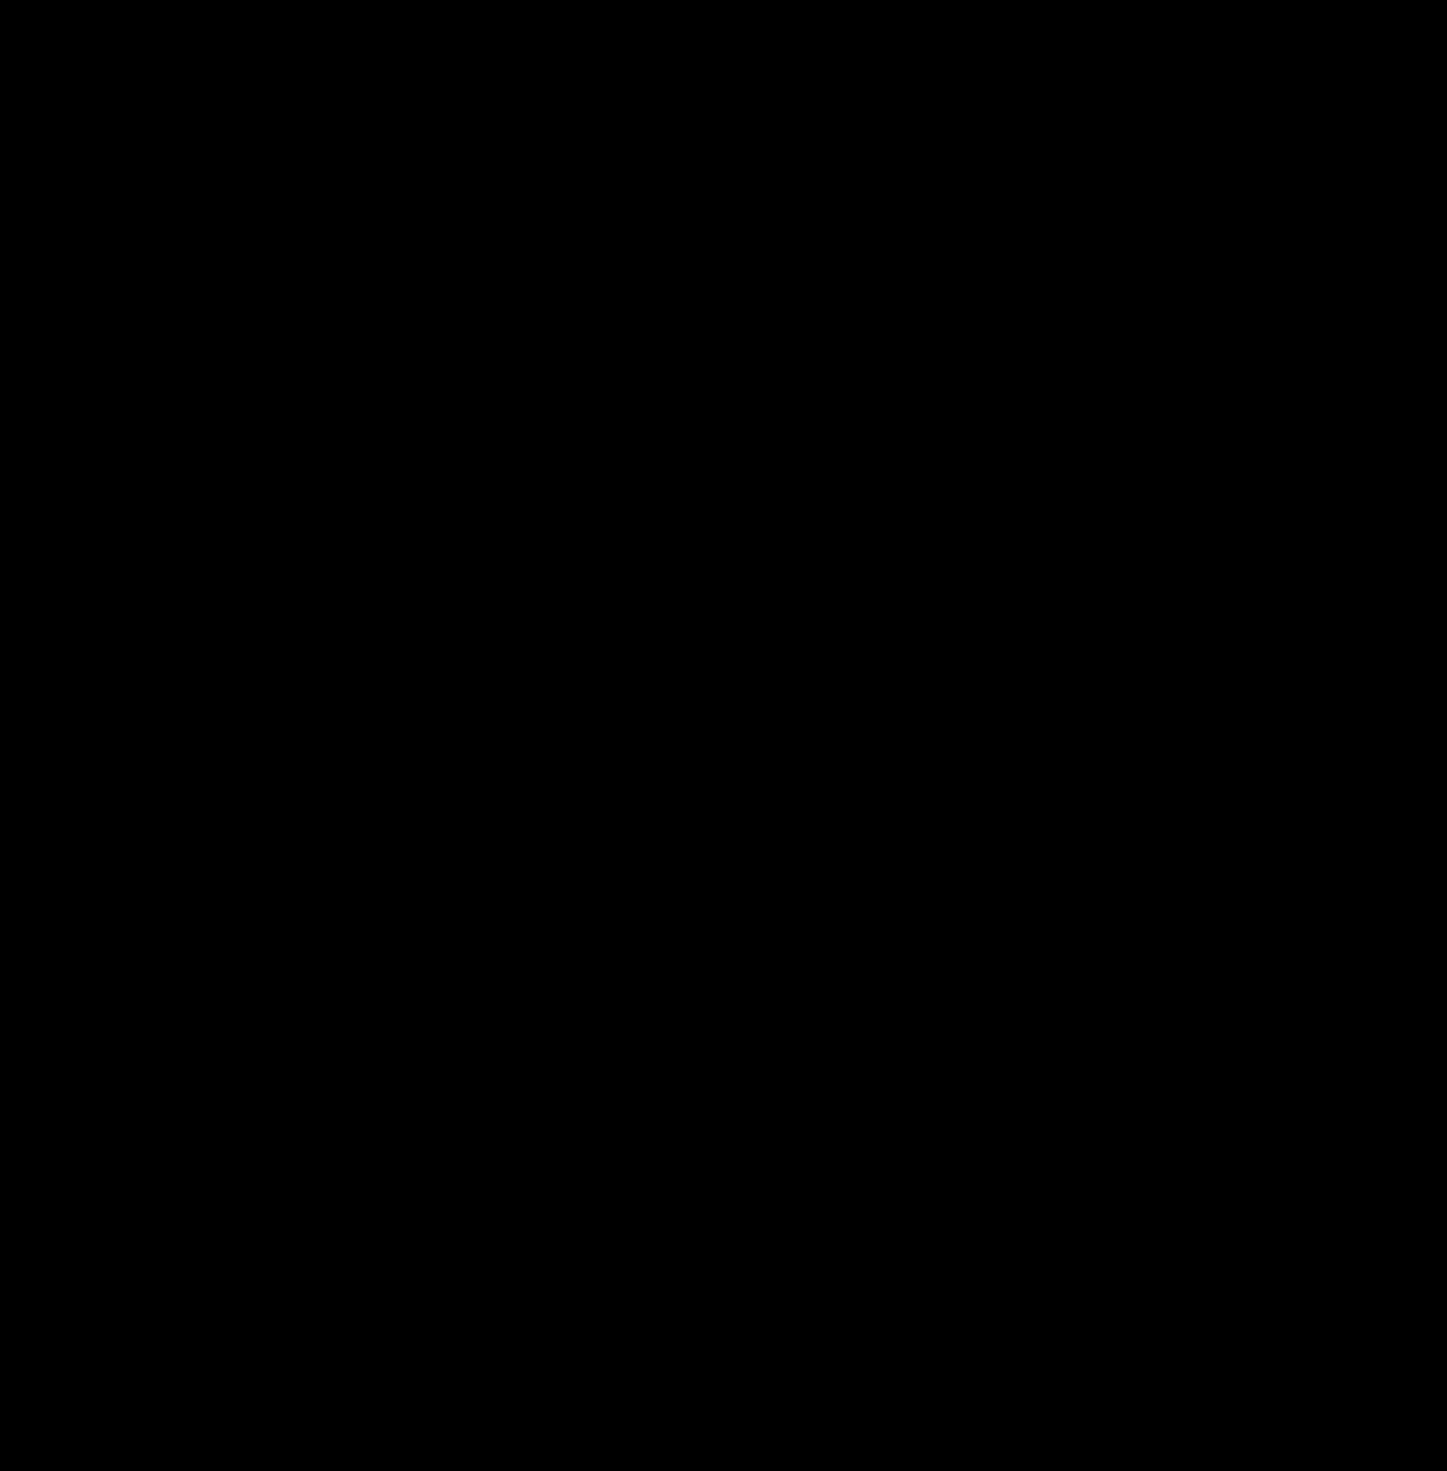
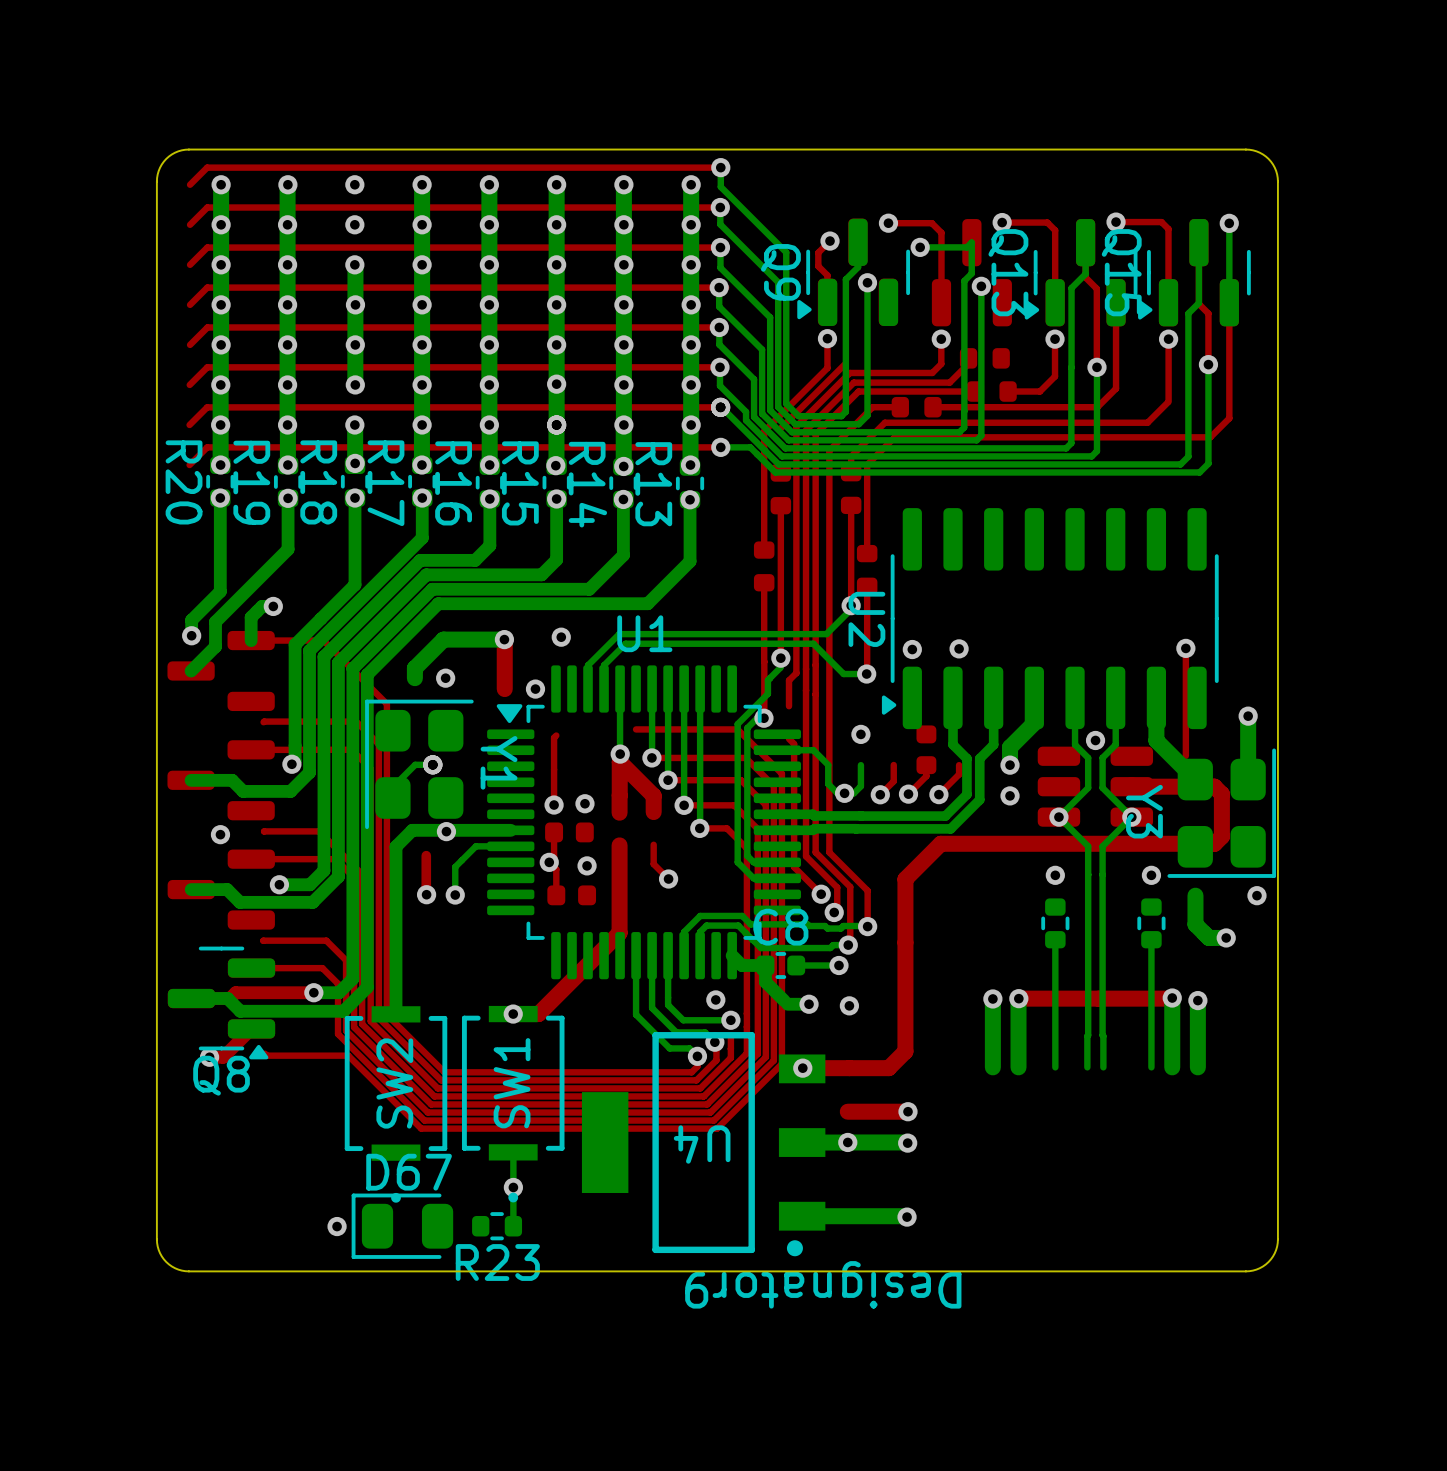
board edge: none -> (1245, 149) (188, 149) (178, 151) (166, 158) (160, 167) (156, 181) (156, 1239) (160, 1253) (166, 1262) (175, 1268) (188, 1271) (1245, 1271) (1259, 1268) (1268, 1262) (1276, 1249) (1277, 1239) (1277, 181) (1274, 167) (1268, 158) (1259, 152) (1245, 149)
top track: none -> (720, 167) (207, 167) (190, 184)
bottom track: none -> (720, 167) (720, 186) (786, 252) (786, 403) (798, 416) (841, 416) (845, 411) (845, 279) (858, 267) (858, 242)
via: none -> (720, 167)
bottom track: none -> (221, 184) (221, 344)
via: none -> (221, 184)
via: none -> (287, 184)
via: none -> (354, 184)
via: none -> (422, 184)
via: none -> (489, 184)
via: none -> (556, 184)
bottom track: none -> (623, 184) (623, 424)
via: none -> (623, 184)
bottom track: none -> (691, 184) (691, 424)
via: none -> (691, 184)
top track: none -> (720, 207) (207, 207) (190, 224)
bottom track: none -> (720, 207) (720, 224) (778, 282) (778, 407) (795, 424) (858, 424) (867, 415) (867, 282)
via: none -> (720, 207)
top track: none -> (1002, 222) (1047, 222) (1055, 230) (1055, 302)
via: none -> (1002, 222)
top track: none -> (1116, 222) (1161, 222) (1168, 229) (1168, 302)
via: none -> (1116, 222)
top track: none -> (888, 223) (931, 223) (941, 232) (941, 302)
via: none -> (888, 223)
bottom track: none -> (1229, 223) (1229, 302)
via: none -> (1229, 223)
via: none -> (221, 224)
via: none -> (287, 224)
via: none -> (354, 224)
via: none -> (422, 224)
via: none -> (489, 224)
via: none -> (556, 224)
via: none -> (623, 224)
via: none -> (691, 224)
top track: none -> (830, 241) (818, 252) (818, 266) (827, 275) (827, 302)
via: none -> (830, 241)
top track: none -> (1085, 242) (1085, 277) (1096, 288) (1096, 367)
bottom track: none -> (1085, 242) (1085, 274) (1071, 288) (1071, 443) (1066, 448) (785, 448) (754, 417) (754, 379) (719, 344) (719, 327)
top track: none -> (1198, 242) (1198, 303) (1208, 313) (1208, 364)
bottom track: none -> (1198, 242) (1198, 303) (1188, 313) (1188, 456) (1180, 464) (778, 464) (720, 407)
bottom track: none -> (720, 247) (720, 267) (770, 317) (770, 410) (792, 432) (959, 432) (964, 427) (964, 411)
via: none -> (720, 247)
top track: none -> (725, 247) (207, 247) (190, 264)
bottom track: none -> (920, 247) (966, 247) (971, 242) (971, 273) (964, 280) (964, 410)
via: none -> (920, 247)
via: none -> (221, 264)
via: none -> (287, 264)
via: none -> (354, 264)
via: none -> (422, 264)
via: none -> (489, 264)
via: none -> (556, 264)
via: none -> (623, 264)
via: none -> (691, 264)
bottom track: none -> (355, 265) (355, 384)
Q9: none -> (853, 272)
part: none -> (971, 272)
Q13: none -> (1081, 272)
Q15: none -> (1194, 272)
via: none -> (867, 282)
bottom track: none -> (981, 286) (981, 435) (976, 440) (788, 440) (762, 413) (762, 349) (719, 306) (719, 287)
via: none -> (981, 286)
via: none -> (719, 287)
top track: none -> (726, 287) (207, 287) (190, 304)
top track: none -> (1116, 302) (1116, 388) (1097, 407) (932, 407)
top track: none -> (1229, 302) (1229, 418) (1210, 437) (894, 437) (867, 464) (867, 553)
via: none -> (221, 304)
via: none -> (287, 304)
via: none -> (355, 304)
via: none -> (422, 304)
via: none -> (489, 304)
via: none -> (556, 304)
via: none -> (623, 304)
via: none -> (691, 304)
top track: none -> (719, 327) (207, 327) (190, 344)
via: none -> (719, 327)
top track: none -> (827, 338) (827, 368) (764, 431) (764, 550)
via: none -> (827, 338)
top track: none -> (941, 339) (941, 363) (932, 372) (849, 372) (796, 426) (796, 673) (789, 680) (789, 706)
via: none -> (941, 339)
top track: none -> (1055, 339) (1055, 376) (1039, 391) (1008, 391)
via: none -> (1055, 339)
top track: none -> (1168, 339) (1168, 401)
via: none -> (1168, 339)
via: none -> (221, 344)
via: none -> (287, 344)
via: none -> (355, 344)
via: none -> (422, 344)
via: none -> (489, 344)
via: none -> (556, 344)
via: none -> (623, 344)
via: none -> (691, 344)
top track: none -> (968, 358) (968, 363) (949, 382) (853, 382) (806, 430) (806, 856) (837, 887) (837, 909) (834, 912)
part: none -> (984, 358)
top track: none -> (845, 363) (780, 428)
bottom track: none -> (1208, 364) (1208, 463) (1199, 472) (775, 472) (750, 447) (720, 447)
via: none -> (1208, 364)
top track: none -> (719, 367) (207, 367) (189, 384)
via: none -> (719, 367)
bottom track: none -> (1096, 367) (1096, 451) (1091, 456) (782, 456) (746, 420) (746, 411) (719, 385) (719, 367)
via: none -> (1096, 367)
via: none -> (220, 384)
via: none -> (287, 384)
via: none -> (355, 384)
via: none -> (422, 384)
via: none -> (489, 384)
via: none -> (556, 384)
via: none -> (623, 384)
via: none -> (691, 384)
top track: none -> (975, 391) (858, 391) (815, 434) (815, 852) (850, 886) (850, 943) (848, 945)
part: none -> (991, 391)
top track: none -> (1167, 402) (1147, 422) (884, 422) (851, 456) (851, 472)
top track: none -> (720, 407) (207, 407) (189, 424)
via: none -> (720, 407)
top track: none -> (900, 407) (872, 407) (829, 450) (829, 852) (867, 890) (867, 926) (863, 922)
part: none -> (916, 407)
via: none -> (220, 424)
via: none -> (287, 424)
via: none -> (354, 424)
via: none -> (422, 424)
via: none -> (489, 424)
via: none -> (556, 424)
via: none -> (623, 424)
via: none -> (691, 424)
bottom track: none -> (355, 425) (355, 464)
bottom track: none -> (623, 425) (623, 465)
bottom track: none -> (690, 425) (690, 465)
top track: none -> (720, 447) (207, 447) (189, 465)
via: none -> (720, 447)
via: none -> (355, 463)
via: none -> (220, 465)
via: none -> (287, 465)
via: none -> (421, 465)
via: none -> (489, 465)
via: none -> (555, 465)
via: none -> (690, 465)
via: none -> (623, 466)
R20: none -> (220, 481)
R18: none -> (355, 481)
R17: none -> (422, 481)
R19: none -> (288, 482)
R16: none -> (489, 482)
R15: none -> (556, 482)
R14: none -> (623, 483)
R13: none -> (690, 483)
part: none -> (780, 489)
part: none -> (851, 489)
bottom track: none -> (220, 498) (220, 591) (191, 620) (191, 635)
via: none -> (220, 498)
bottom track: none -> (288, 498) (288, 549) (215, 621) (215, 646) (191, 671)
via: none -> (288, 498)
bottom track: none -> (355, 498) (355, 584) (295, 644) (295, 761) (291, 764)
via: none -> (355, 498)
bottom track: none -> (422, 498) (422, 538) (309, 650) (309, 772) (290, 791) (243, 791) (232, 780) (191, 780)
via: none -> (422, 498)
bottom track: none -> (489, 498) (489, 545) (475, 560) (420, 560) (323, 656) (323, 870) (309, 884) (279, 884)
via: none -> (489, 498)
bottom track: none -> (556, 498) (556, 559) (541, 574) (426, 574) (338, 662) (338, 876) (312, 902) (239, 902) (227, 889) (191, 889)
via: none -> (556, 498)
bottom track: none -> (623, 499) (623, 555) (589, 589) (432, 589) (352, 668) (352, 978) (338, 992) (313, 992)
via: none -> (623, 499)
bottom track: none -> (690, 499) (690, 561) (647, 603) (438, 603) (367, 674) (367, 987) (343, 1011) (240, 1011) (227, 998) (191, 998)
via: none -> (690, 499)
top track: none -> (780, 505) (780, 658)
top track: none -> (851, 505) (851, 605)
part: none -> (764, 566)
part: none -> (867, 569)
top track: none -> (867, 586) (866, 674)
bottom track: none -> (851, 605) (851, 609) (826, 634) (619, 634) (588, 665) (588, 689)
via: none -> (851, 605)
bottom track: none -> (273, 606) (262, 606) (251, 617) (251, 640)
via: none -> (273, 606)
U2: none -> (1050, 618)
via: none -> (191, 635)
via: none -> (561, 637)
top track: none -> (504, 639) (504, 689)
bottom track: none -> (504, 639) (443, 639) (414, 668) (414, 678)
via: none -> (504, 639)
top track: none -> (251, 640) (323, 640) (386, 704) (386, 1014) (444, 1072) (691, 1072) (697, 1066) (697, 1056)
via: none -> (959, 648)
top track: none -> (1185, 648) (1185, 755)
via: none -> (1185, 648)
via: none -> (912, 649)
bottom track: none -> (780, 658) (780, 667) (767, 680) (767, 693) (737, 724) (737, 862) (753, 878) (777, 878)
via: none -> (780, 658)
part: none -> (221, 670)
bottom track: none -> (866, 674) (843, 674) (813, 643) (625, 643) (604, 665) (604, 689)
via: none -> (866, 674)
via: none -> (445, 678)
bottom track: none -> (1074, 688) (1075, 744) (1088, 757) (1088, 787) (1058, 817) (1088, 846) (1087, 1067)
bottom track: none -> (1115, 688) (1115, 744) (1102, 757) (1102, 787) (1131, 817) (1102, 846) (1103, 1067)
via: none -> (535, 689)
bottom track: none -> (620, 689) (620, 753)
bottom track: none -> (652, 689) (652, 757)
bottom track: none -> (668, 689) (668, 780)
bottom track: none -> (684, 689) (684, 805)
bottom track: none -> (700, 689) (700, 828)
bottom track: none -> (953, 697) (953, 744) (966, 758) (966, 794) (945, 816) (861, 816)
bottom track: none -> (993, 697) (993, 744) (979, 758) (979, 799) (950, 828) (856, 828)
bottom track: none -> (1034, 697) (1034, 723) (1010, 747) (1010, 765)
bottom track: none -> (1156, 697) (1156, 740) (1195, 779)
bottom track: none -> (1248, 716) (1248, 779)
via: none -> (1248, 716)
bottom track: none -> (763, 718) (757, 718) (747, 728) (747, 855) (753, 862) (777, 862)
via: none -> (763, 718)
top track: none -> (263, 722) (356, 721) (378, 744) (378, 1018) (441, 1080) (696, 1080) (716, 1060) (714, 1042)
top track: none -> (636, 729) (737, 729) (781, 773) (781, 1063) (717, 1128) (421, 1128) (348, 1055) (266, 1055) (265, 1053)
via: none -> (860, 734)
top track: none -> (556, 735) (554, 737) (554, 805)
top track: none -> (789, 738) (794, 744) (794, 867) (821, 894)
via: none -> (1095, 740)
top track: none -> (251, 749) (351, 749) (370, 768) (370, 1021) (437, 1088) (700, 1088) (730, 1057) (730, 1048)
part: none -> (926, 749)
bottom track: none -> (777, 750) (813, 750) (828, 764) (828, 784) (837, 793) (853, 793) (860, 786) (860, 765)
via: none -> (620, 754)
top track: none -> (651, 757) (745, 757) (773, 786) (773, 1060) (713, 1120) (424, 1120) (338, 1034) (338, 983) (322, 968) (251, 968)
via: none -> (651, 757)
via: none -> (291, 764)
Y1: none -> (419, 764)
bottom track: none -> (432, 764) (415, 764) (392, 787) (392, 797)
via: none -> (432, 764)
top track: none -> (893, 764) (893, 781) (880, 794)
top track: none -> (926, 765) (926, 776) (908, 794)
top track: none -> (959, 765) (959, 774) (938, 794)
via: none -> (1010, 765)
part: none -> (221, 780)
top track: none -> (668, 780) (740, 780) (765, 805) (765, 1057) (710, 1112)
via: none -> (668, 780)
part: none -> (1095, 786)
top track: none -> (1131, 786) (1214, 786) (1221, 794) (1221, 836) (1214, 843) (940, 843) (905, 879) (905, 1051) (888, 1068) (802, 1068)
via: none -> (844, 793)
via: none -> (880, 794)
via: none -> (908, 794)
via: none -> (938, 794)
via: none -> (1010, 795)
via: none -> (584, 803)
via: none -> (554, 805)
top track: none -> (684, 805) (734, 805) (757, 829) (757, 1053) (707, 1104)
via: none -> (684, 805)
top track: none -> (653, 812) (653, 795) (619, 761) (619, 812)
Y3: none -> (1221, 813)
bottom track: none -> (777, 814) (861, 815)
via: none -> (1058, 817)
via: none -> (1131, 817)
U1: none -> (644, 822)
top track: none -> (699, 828) (726, 828) (746, 848) (746, 1013)
via: none -> (699, 828)
bottom track: none -> (856, 828) (777, 830)
bottom track: none -> (510, 830) (412, 830) (396, 846) (396, 1014)
top track: none -> (264, 831) (319, 831) (362, 874) (362, 1024) (434, 1096) (703, 1096)
via: none -> (446, 831)
top track: none -> (554, 832) (554, 857) (549, 862) (556, 869) (556, 895)
part: none -> (569, 832)
via: none -> (220, 834)
top track: none -> (653, 844) (653, 864) (668, 879)
top track: none -> (619, 845) (619, 932) (538, 1014) (513, 1014)
bottom track: none -> (510, 846) (475, 846) (455, 867) (455, 895)
top track: none -> (426, 855) (426, 894)
top track: none -> (251, 859) (335, 859) (354, 877) (354, 1027) (431, 1104) (706, 1104)
via: none -> (549, 862)
via: none -> (587, 865)
via: none -> (1055, 875)
via: none -> (1151, 875)
via: none -> (668, 879)
via: none -> (279, 884)
part: none -> (221, 889)
via: none -> (426, 894)
via: none -> (821, 894)
via: none -> (455, 895)
part: none -> (571, 895)
bottom track: none -> (1195, 895) (1195, 924) (1208, 937) (1226, 937)
via: none -> (1256, 895)
via: none -> (834, 912)
part: none -> (1055, 923)
part: none -> (1151, 923)
bottom track: none -> (867, 926) (843, 926) (840, 928) (827, 928) (825, 926) (807, 924) (750, 924) (742, 915) (700, 915) (684, 932) (684, 955)
via: none -> (867, 926)
via: none -> (1226, 937)
bottom track: none -> (1055, 939) (1055, 1067)
bottom track: none -> (1151, 939) (1151, 1067)
top track: none -> (263, 940) (326, 940) (346, 960) (346, 1030) (427, 1112) (710, 1112)
bottom track: none -> (848, 945) (833, 945) (830, 948) (760, 948) (738, 925) (706, 925) (700, 932) (700, 955)
via: none -> (848, 945)
bottom track: none -> (636, 955) (636, 1014) (669, 1048) (689, 1048) (697, 1056)
bottom track: none -> (652, 955) (652, 1008) (676, 1032) (705, 1032) (714, 1042)
bottom track: none -> (668, 955) (668, 1005) (683, 1020) (730, 1020)
bottom track: none -> (732, 955) (742, 965) (765, 965) (765, 981) (787, 1004) (809, 1004)
C8: none -> (780, 965)
bottom track: none -> (838, 965) (796, 965)
via: none -> (838, 965)
top track: none -> (313, 992) (235, 992) (229, 998) (191, 998)
via: none -> (313, 992)
bottom track: none -> (992, 998) (992, 1067)
via: none -> (992, 998)
bottom track: none -> (1018, 998) (1018, 1067)
via: none -> (1018, 998)
top track: none -> (1172, 998) (1018, 998)
bottom track: none -> (1172, 998) (1172, 1067)
via: none -> (1172, 998)
via: none -> (715, 999)
bottom track: none -> (1197, 1000) (1197, 1067)
via: none -> (1197, 1000)
Q8: none -> (221, 1002)
via: none -> (809, 1004)
via: none -> (849, 1005)
top track: none -> (746, 1013) (746, 1026)
via: none -> (513, 1014)
via: none -> (730, 1020)
top track: none -> (746, 1026) (746, 1053) (704, 1096)
top track: none -> (251, 1029) (223, 1057) (209, 1057)
top track: none -> (730, 1035) (730, 1048)
via: none -> (714, 1042)
via: none -> (697, 1056)
via: none -> (209, 1057)
via: none -> (802, 1068)
SW2: none -> (396, 1104)
SW1: none -> (513, 1104)
top track: none -> (908, 1111) (847, 1111)
via: none -> (908, 1111)
via: none -> (847, 1142)
via: none -> (907, 1143)
U4: none -> (703, 1144)
bottom track: none -> (513, 1152) (513, 1226)
via: none -> (513, 1187)
bottom track: none -> (802, 1216) (907, 1217)
via: none -> (907, 1217)
via: none -> (337, 1226)
D67: none -> (402, 1226)
R23: none -> (497, 1226)

